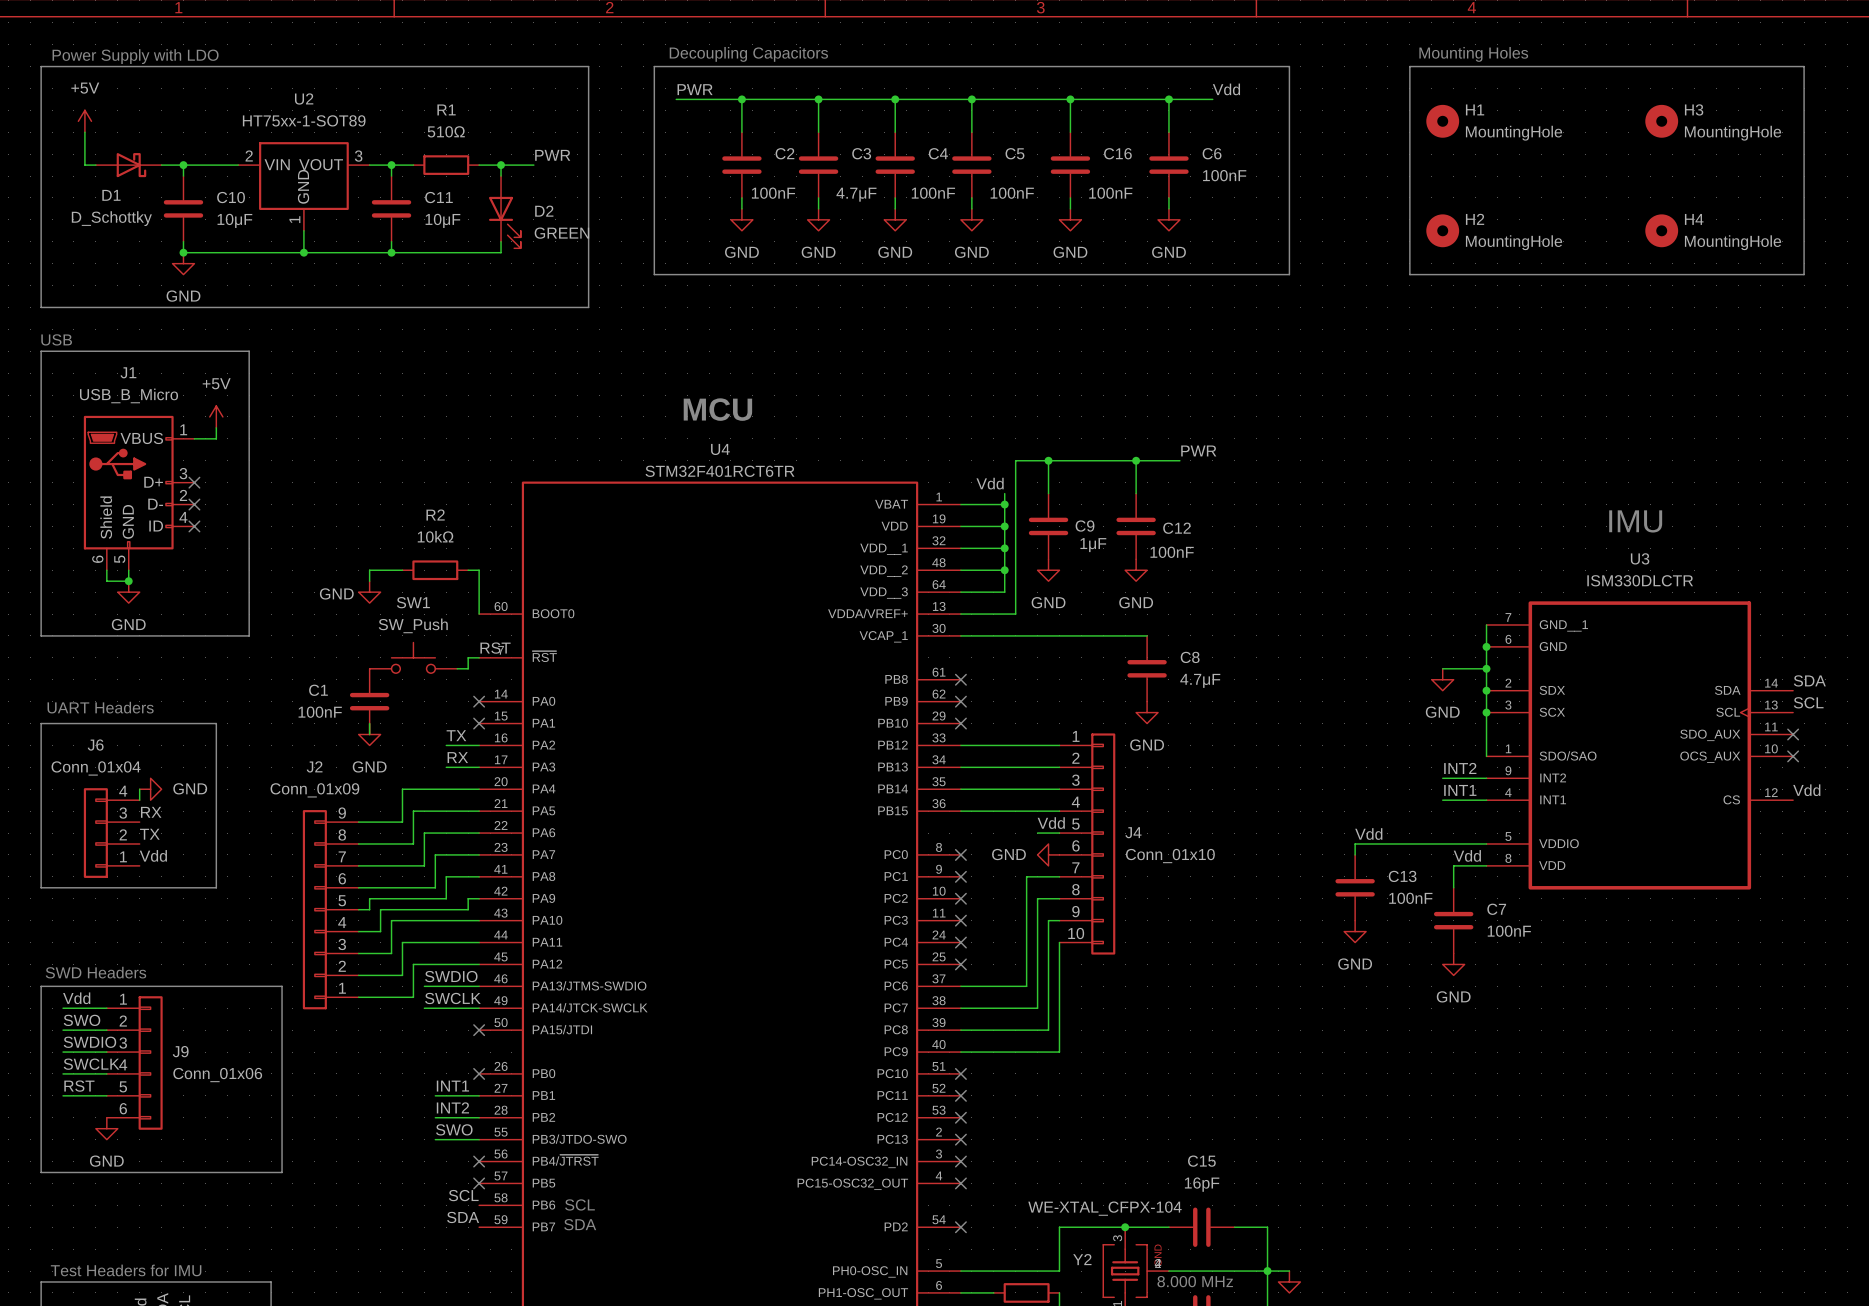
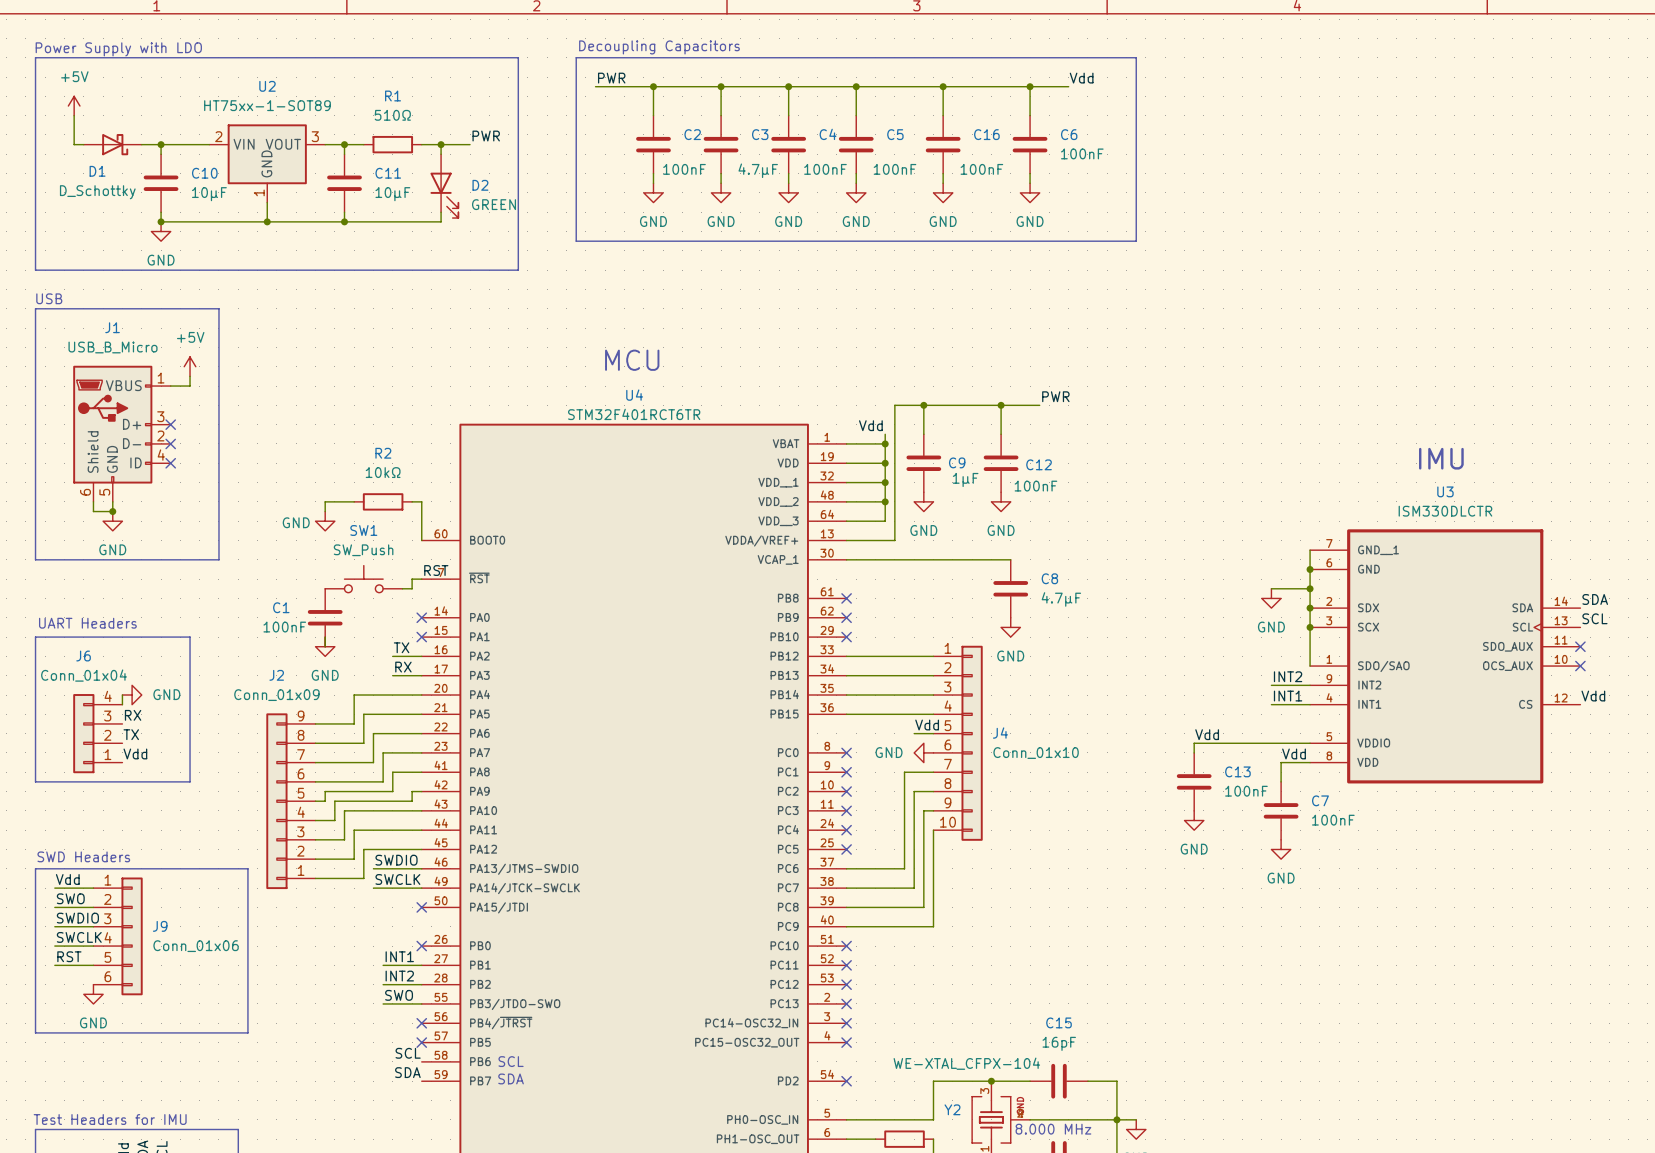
text: Mounting Holes (1473, 54) -> none
line: (1409, 66) (1804, 66) (1804, 274) (1409, 274) (1409, 66) -> none
H1: MountingHole (1442, 121) -> none
H3: MountingHole (1661, 121) -> none
H2: MountingHole (1442, 230) -> none
H4: MountingHole (1661, 230) -> none

